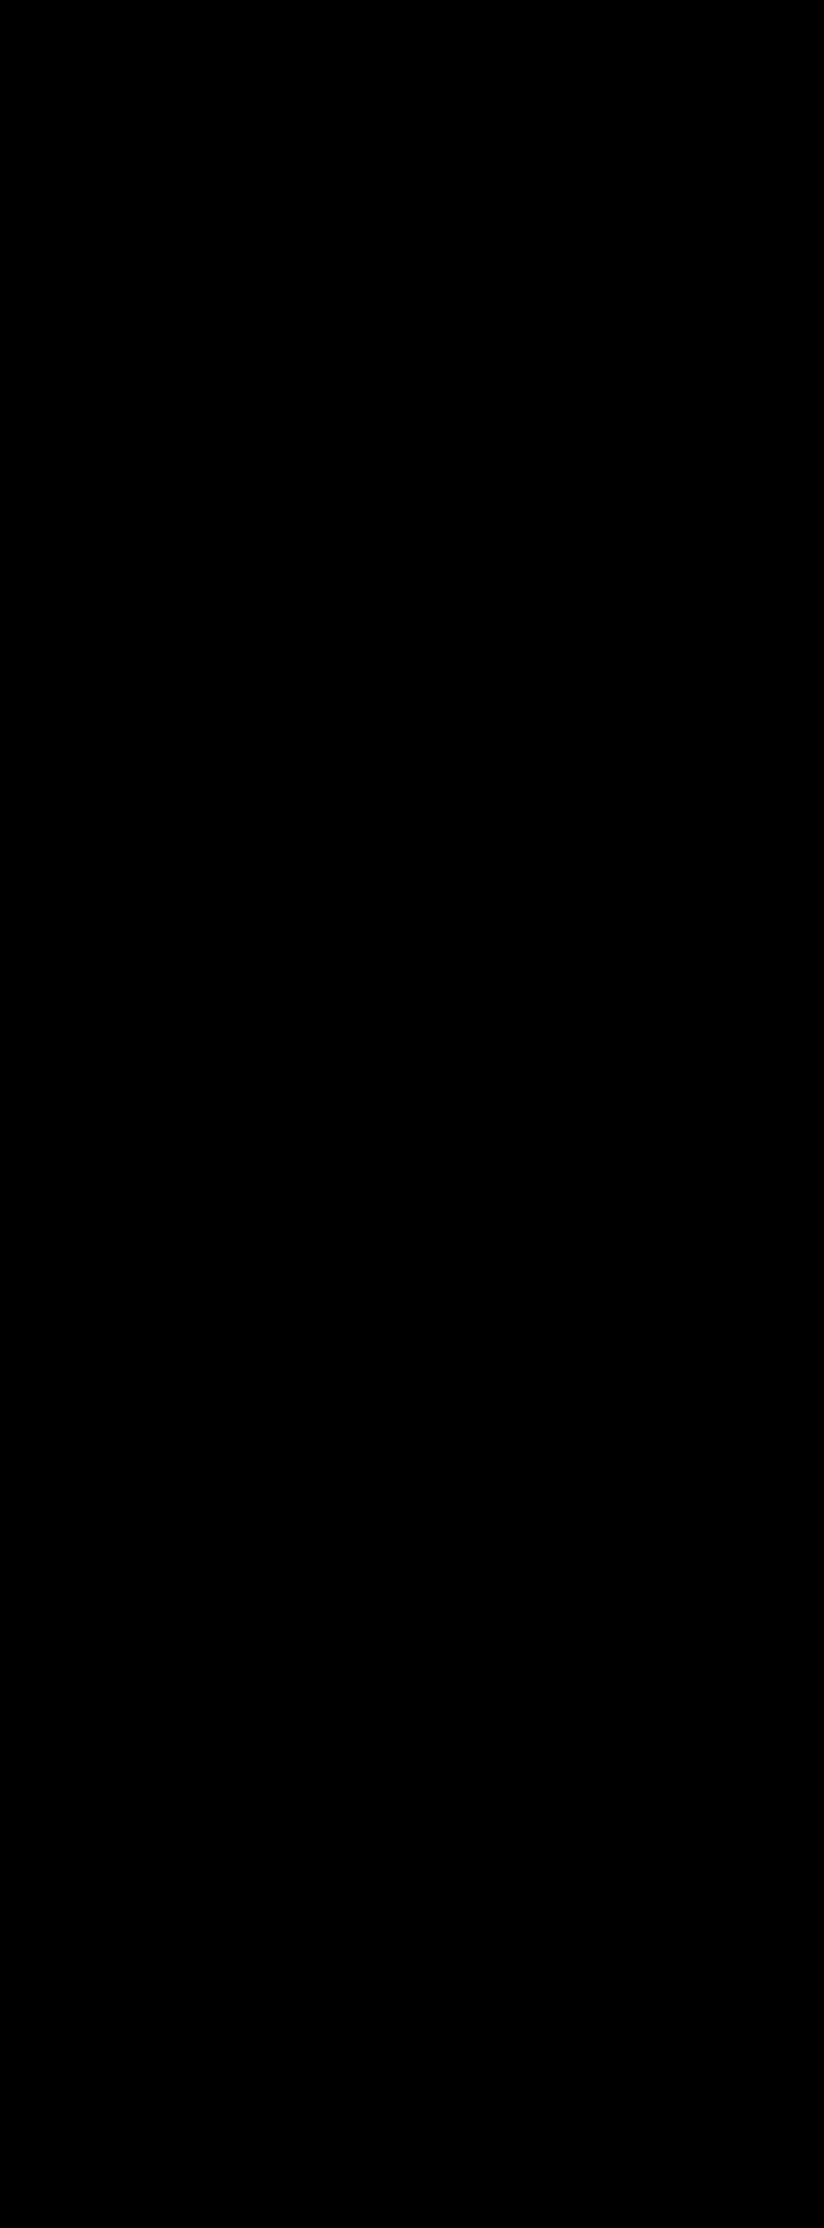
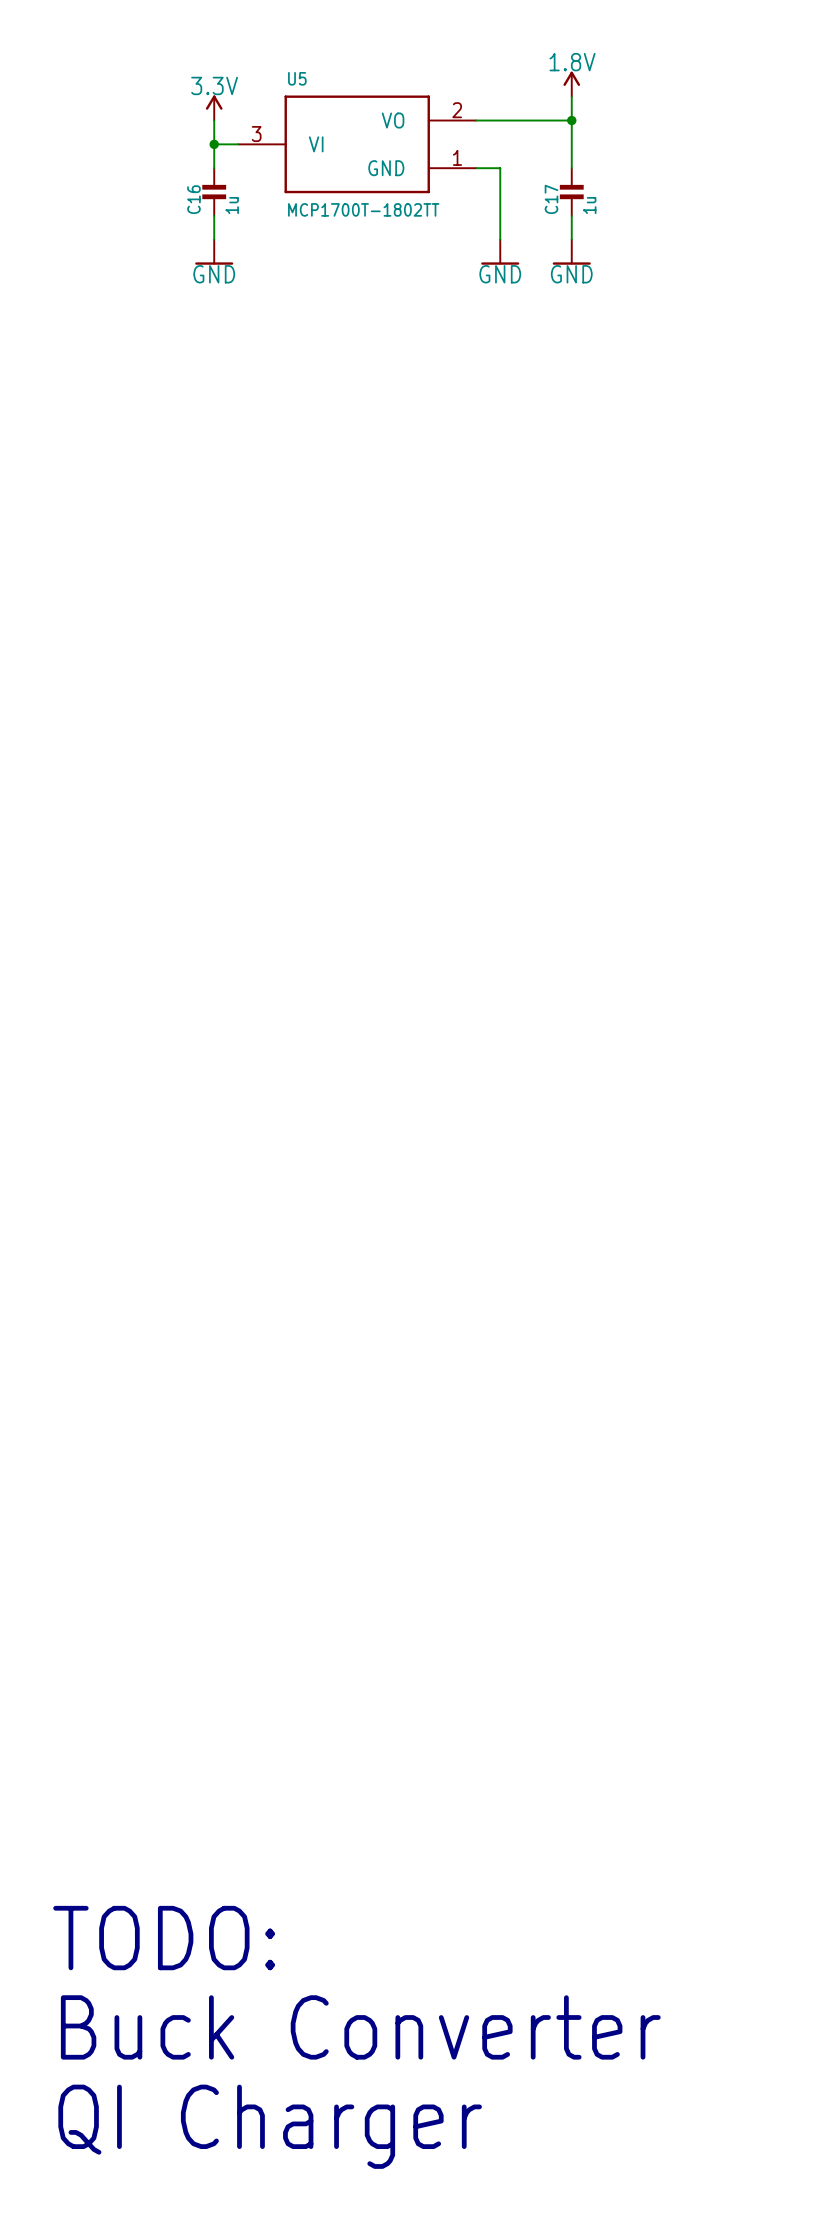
power symbol: none -> 1.8V (571, 84)
wire: none -> (571, 96) (571, 168)
power symbol: none -> 3.3V (214, 108)
wire: none -> (214, 120) (214, 168)
wire: none -> (476, 120) (571, 120)
junction: none -> (571, 120)
wire: none -> (214, 144) (238, 144)
junction: none -> (214, 144)
U5: none -> MCP1700T-1802TT (357, 144)
wire: none -> (476, 168) (500, 168) (500, 239)
C16: none -> 1u (214, 192)
C17: none -> 1u (571, 192)
wire: none -> (214, 215) (214, 239)
wire: none -> (571, 215) (571, 239)
power symbol: none -> GND (214, 252)
power symbol: none -> GND (500, 252)
power symbol: none -> GND (571, 252)
text: none -> TODO: (164, 1938)
text: none -> Buck Converter (360, 2027)
text: none -> QI Charger (270, 2126)

